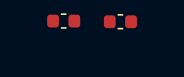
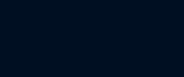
part: (63, 21) -> none
part: (120, 21) -> none

